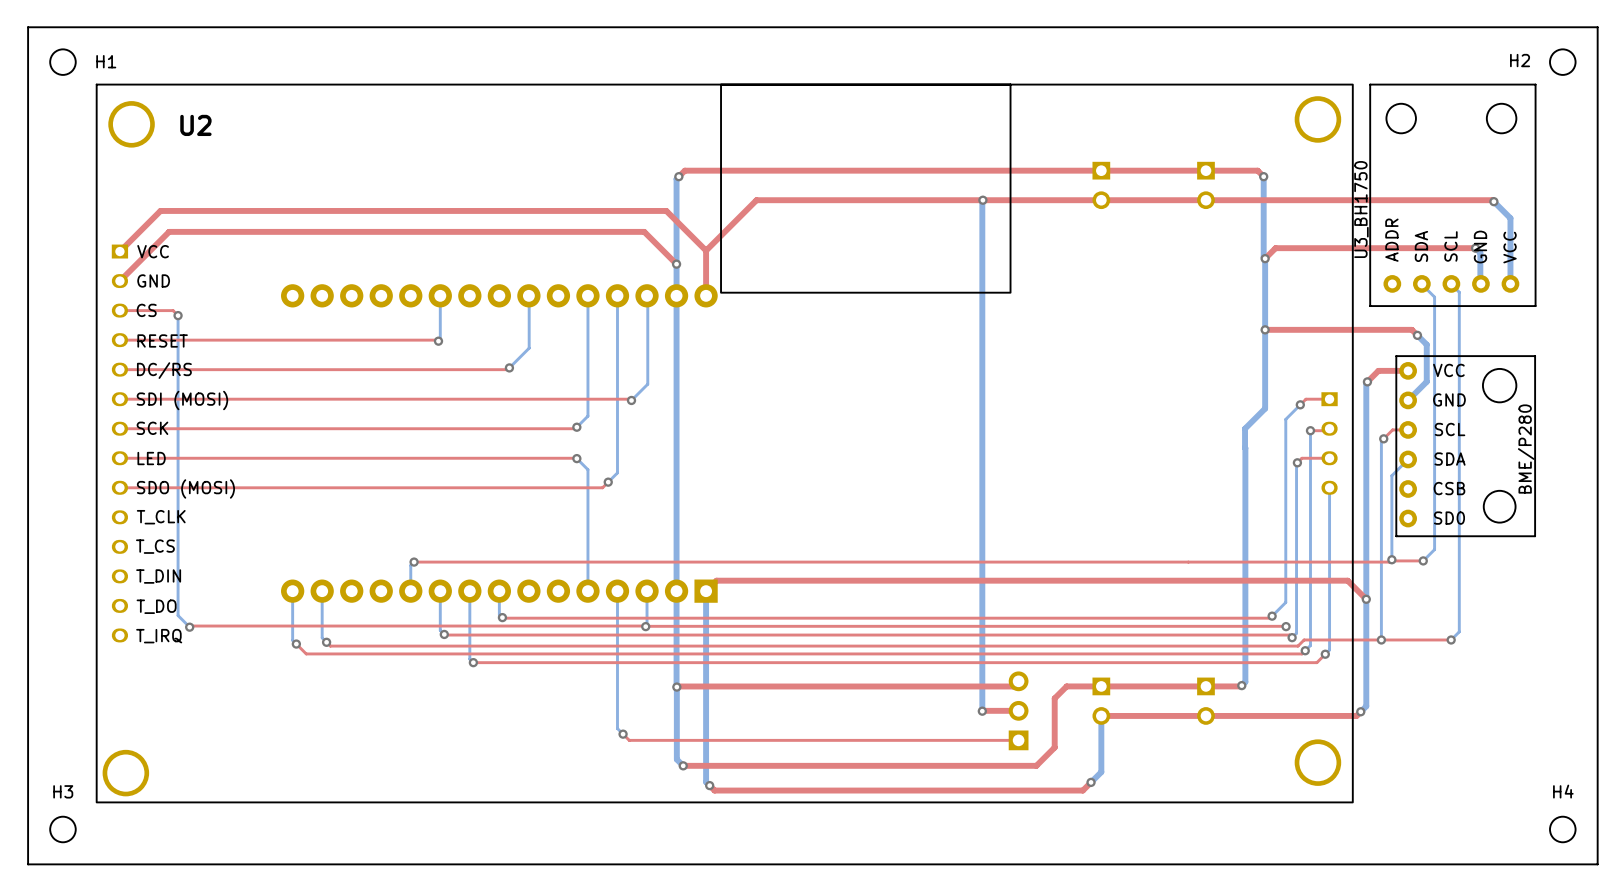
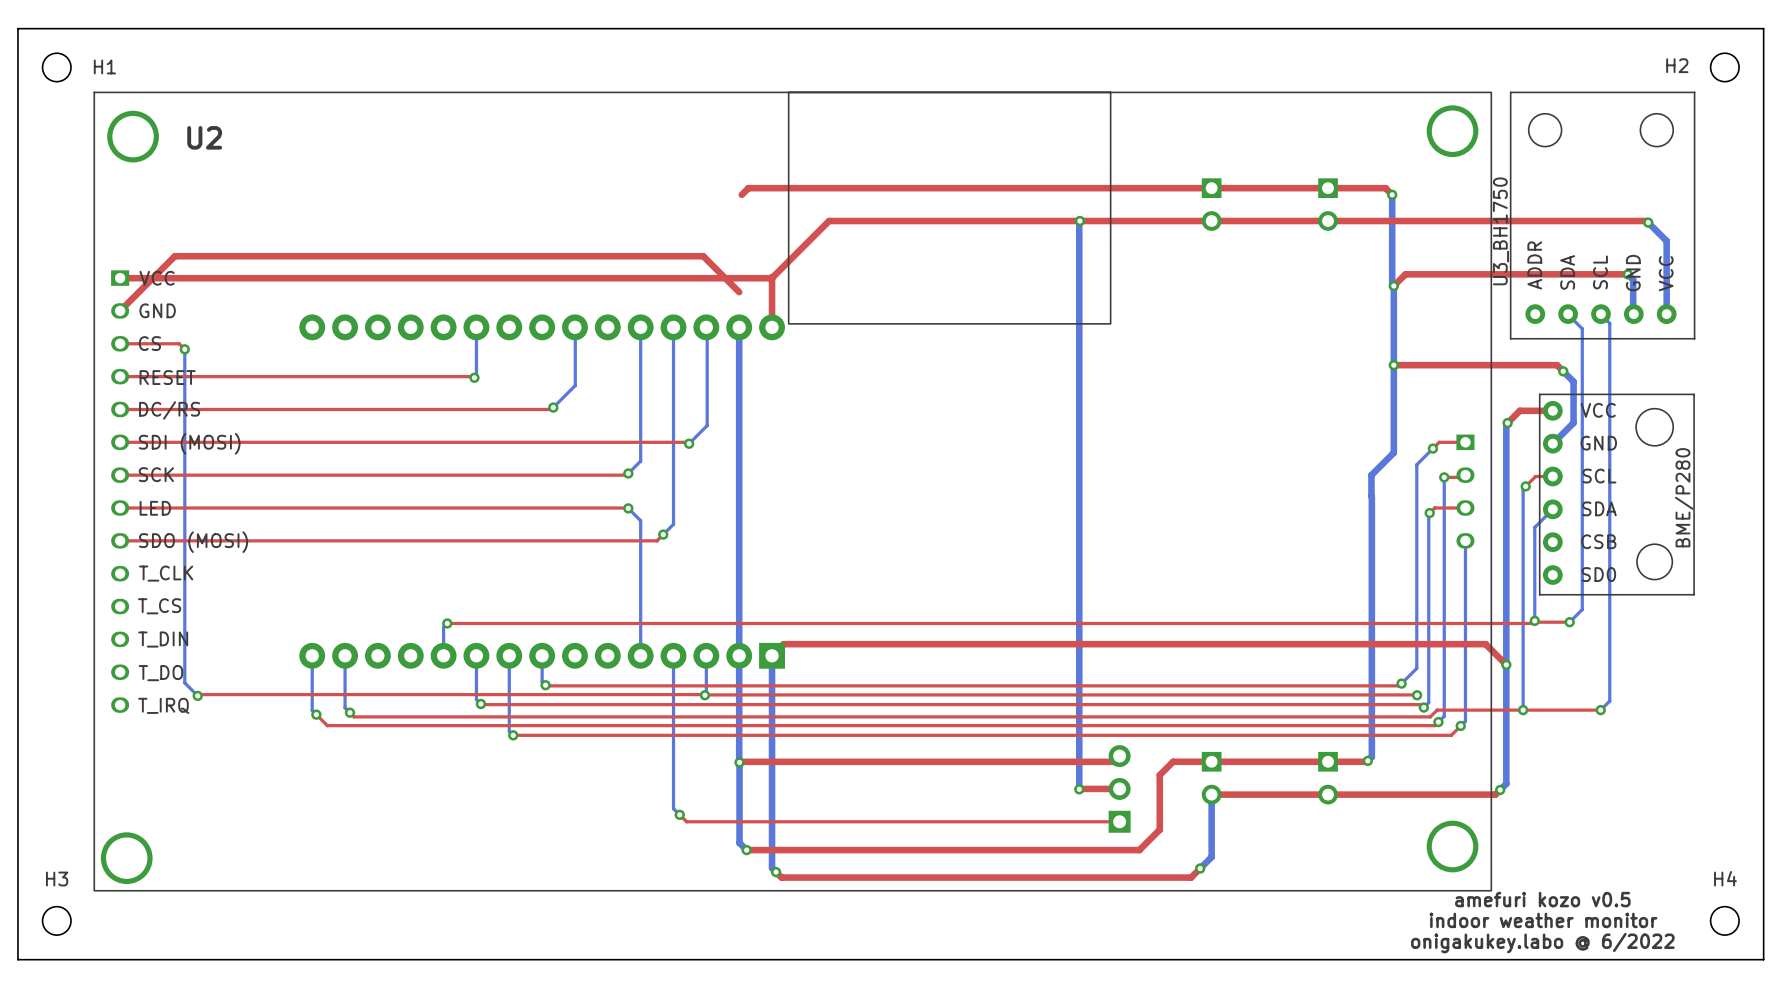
bottom track: (678, 176) (676, 178) (676, 295) -> none
via: (678, 176) -> none
top track: (757, 200) (706, 250) (666, 210) (160, 210) (119, 251) -> (829, 221) (770, 278) (120, 278)
via: (676, 264) -> none
text: none -> amefuri kozo v0.5 (1542, 899)
text: none -> indoor weather monitor (1543, 920)
text: none -> onigakukey.labo @ 6/2022 (1542, 943)

